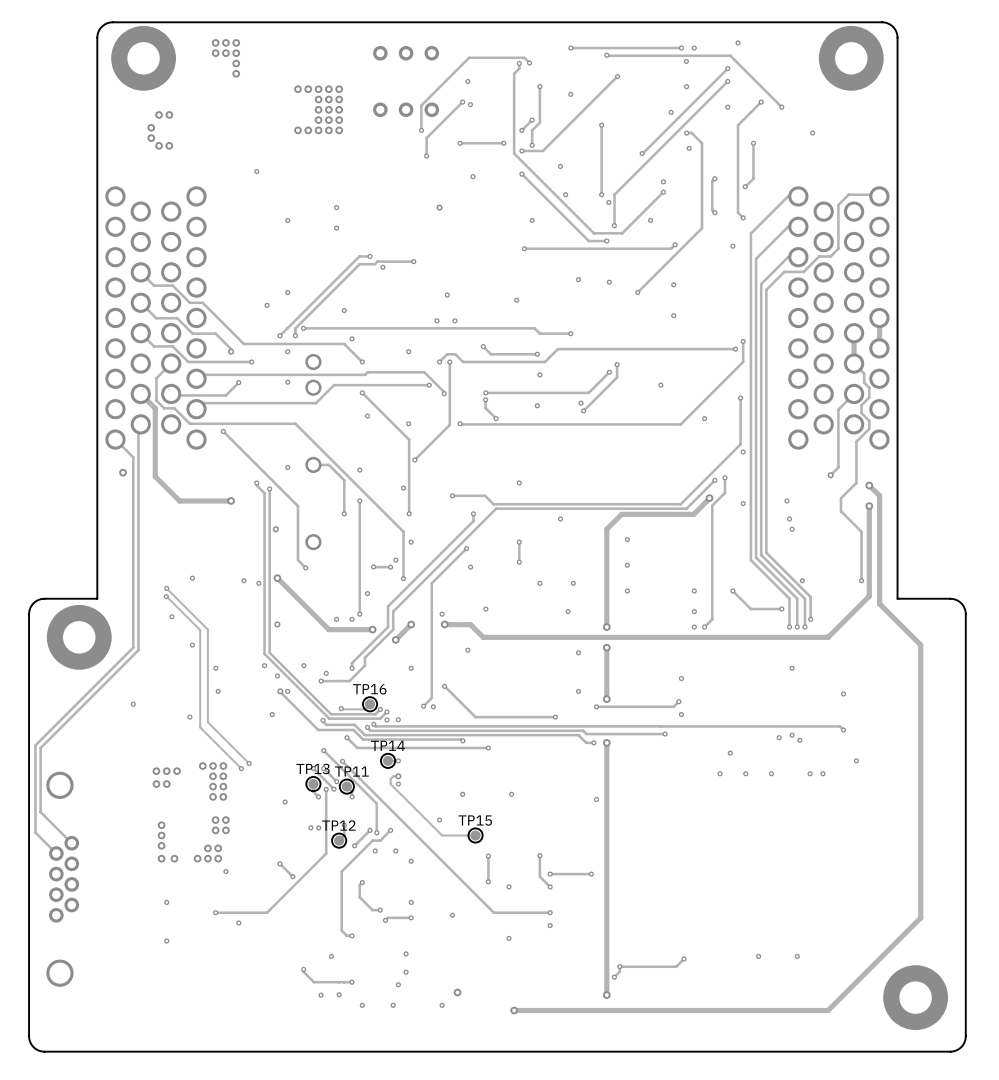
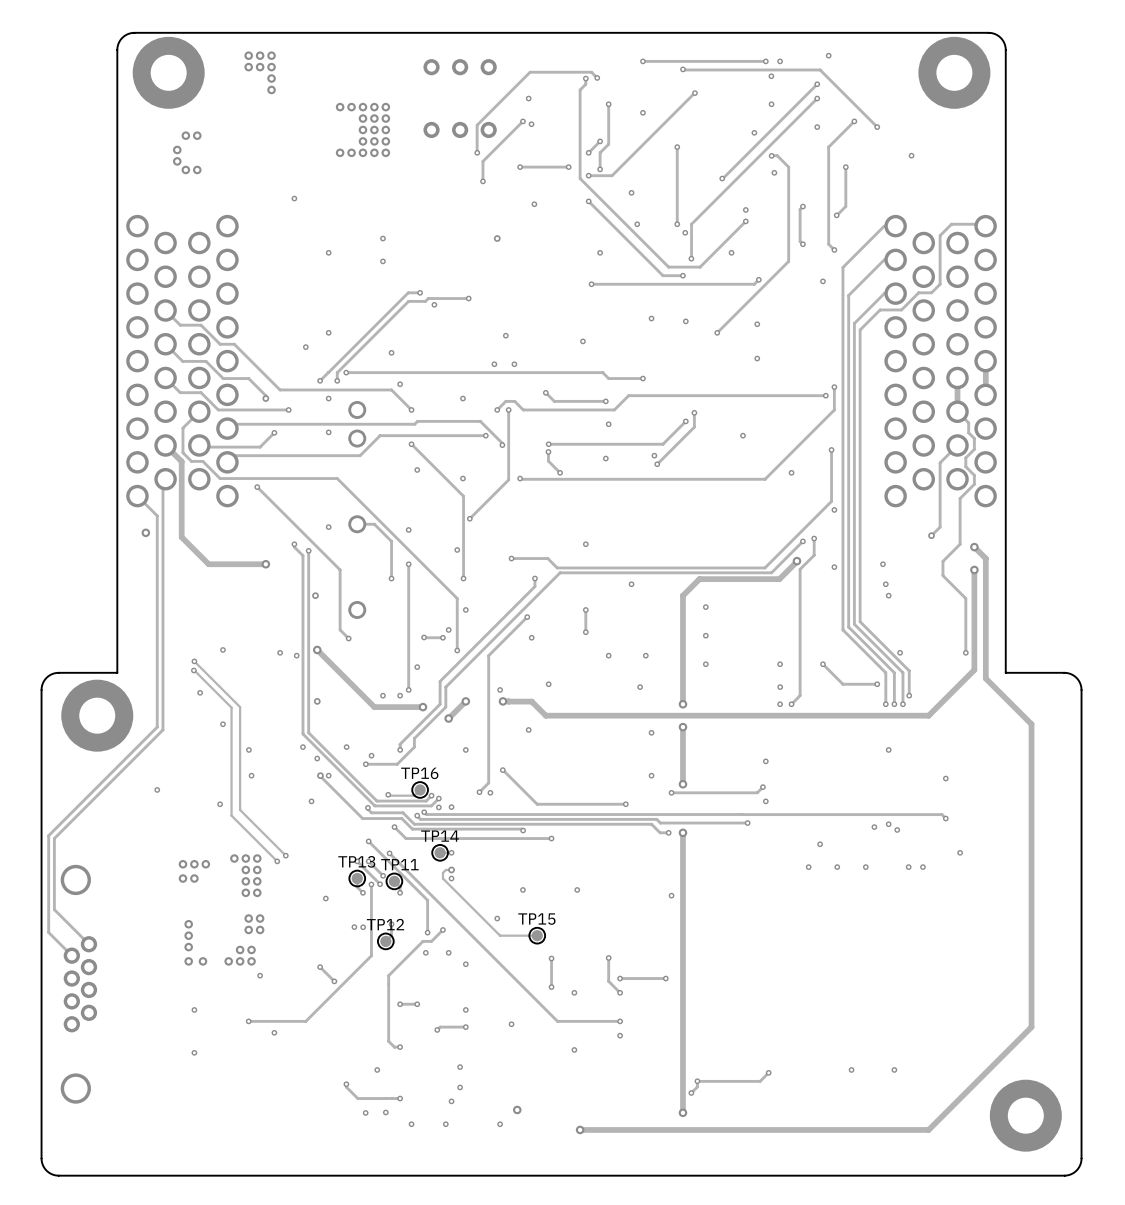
track: (370, 830) (354, 845) -> none
via: (370, 830) -> none
via: (354, 845) -> none
track: (362, 882) (359, 885) (359, 897) (372, 910) (380, 910) -> none
via: (362, 882) -> none
via: none -> (400, 1004)
track: none -> (417, 1004) (400, 1004)
via: none -> (417, 1004)
via: (380, 910) -> none

